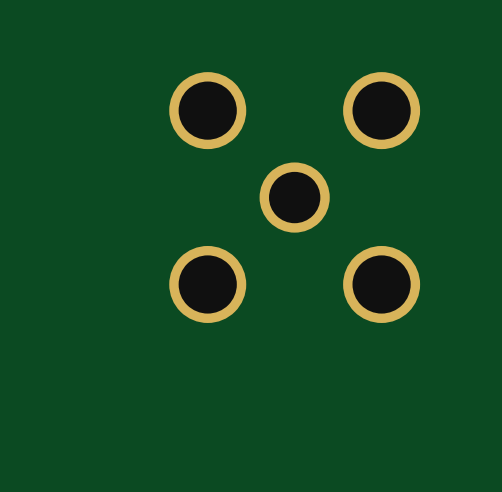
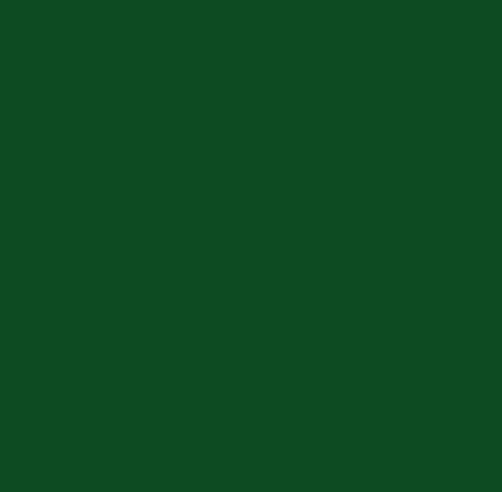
part: (294, 197) -> none

